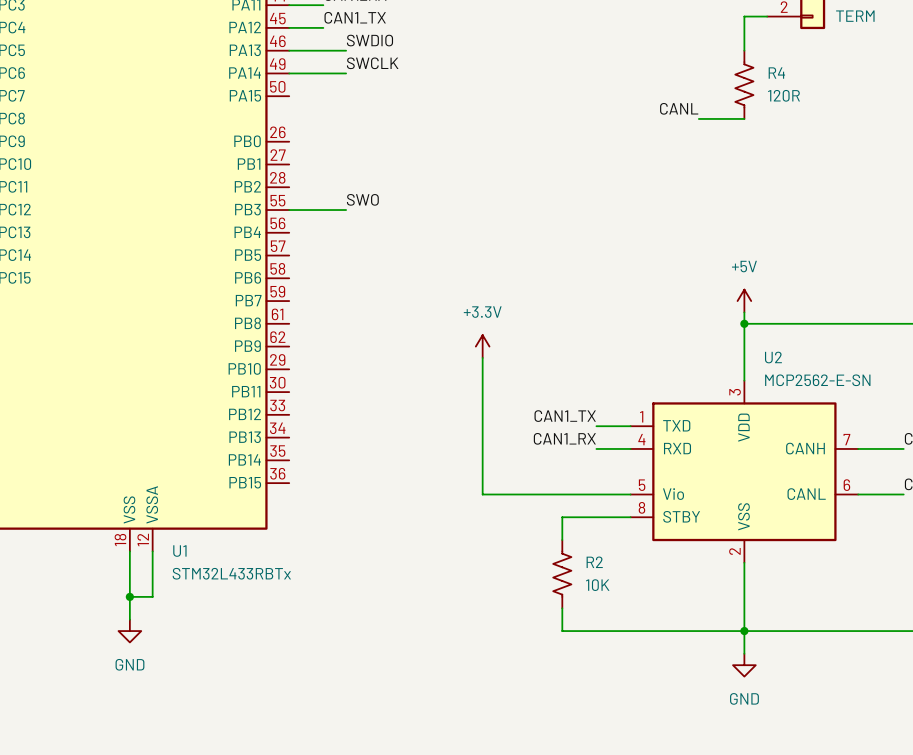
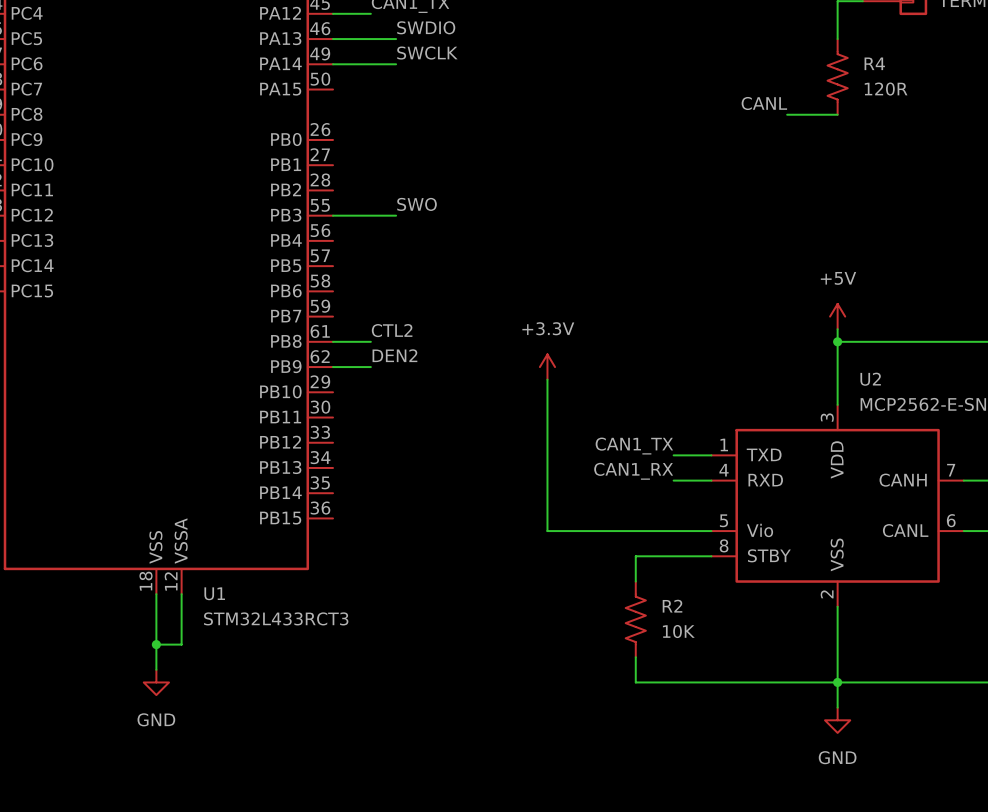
label: none -> CTL2 (392, 330)
wire: none -> (333, 341) (370, 341)
label: none -> DEN2 (394, 355)
wire: none -> (333, 367) (370, 367)
U1 value: STM32L433RBTx (231, 573) -> STM32L433RCT3 (276, 618)

